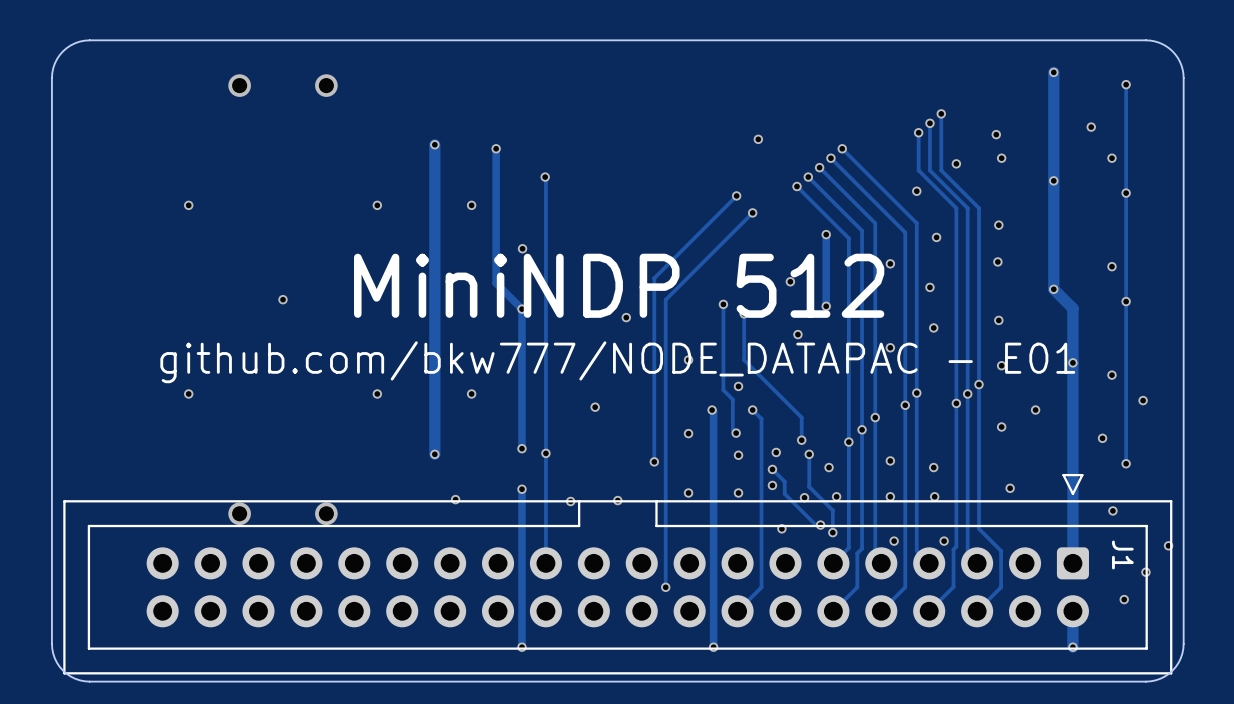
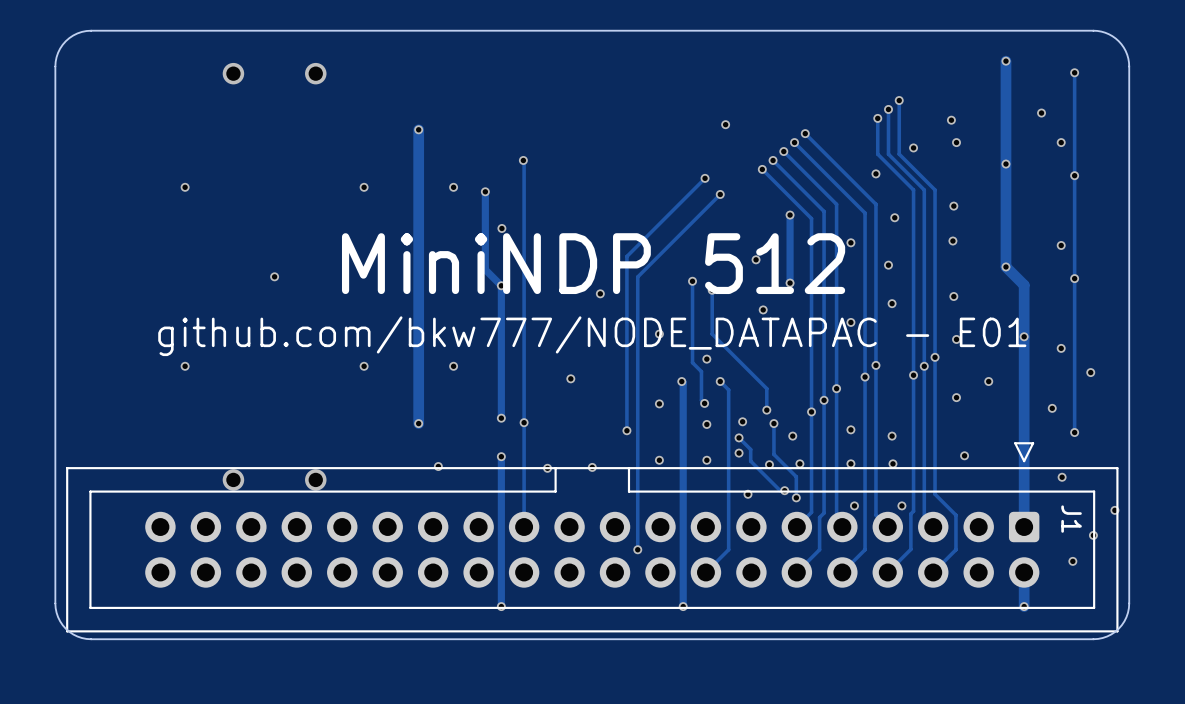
track: (496, 148) (496, 283) (505, 292) -> (485, 191) (485, 269)
via position: (496, 148) -> (485, 191)

